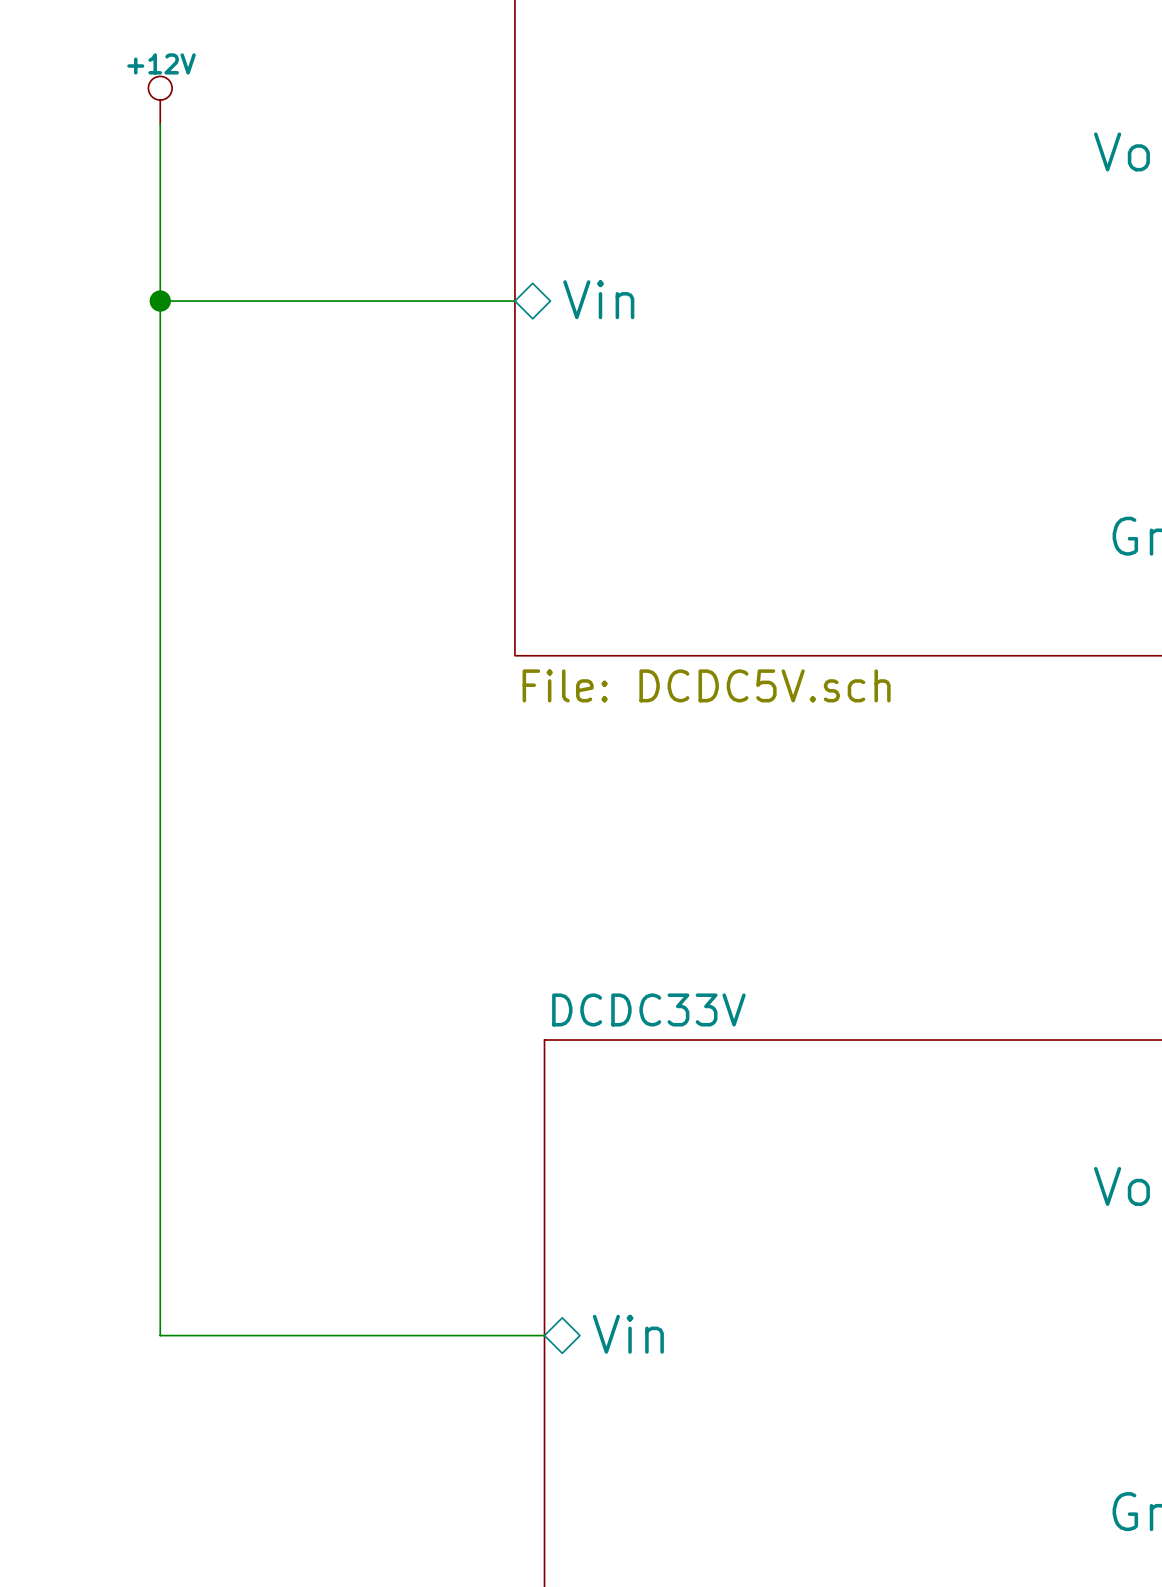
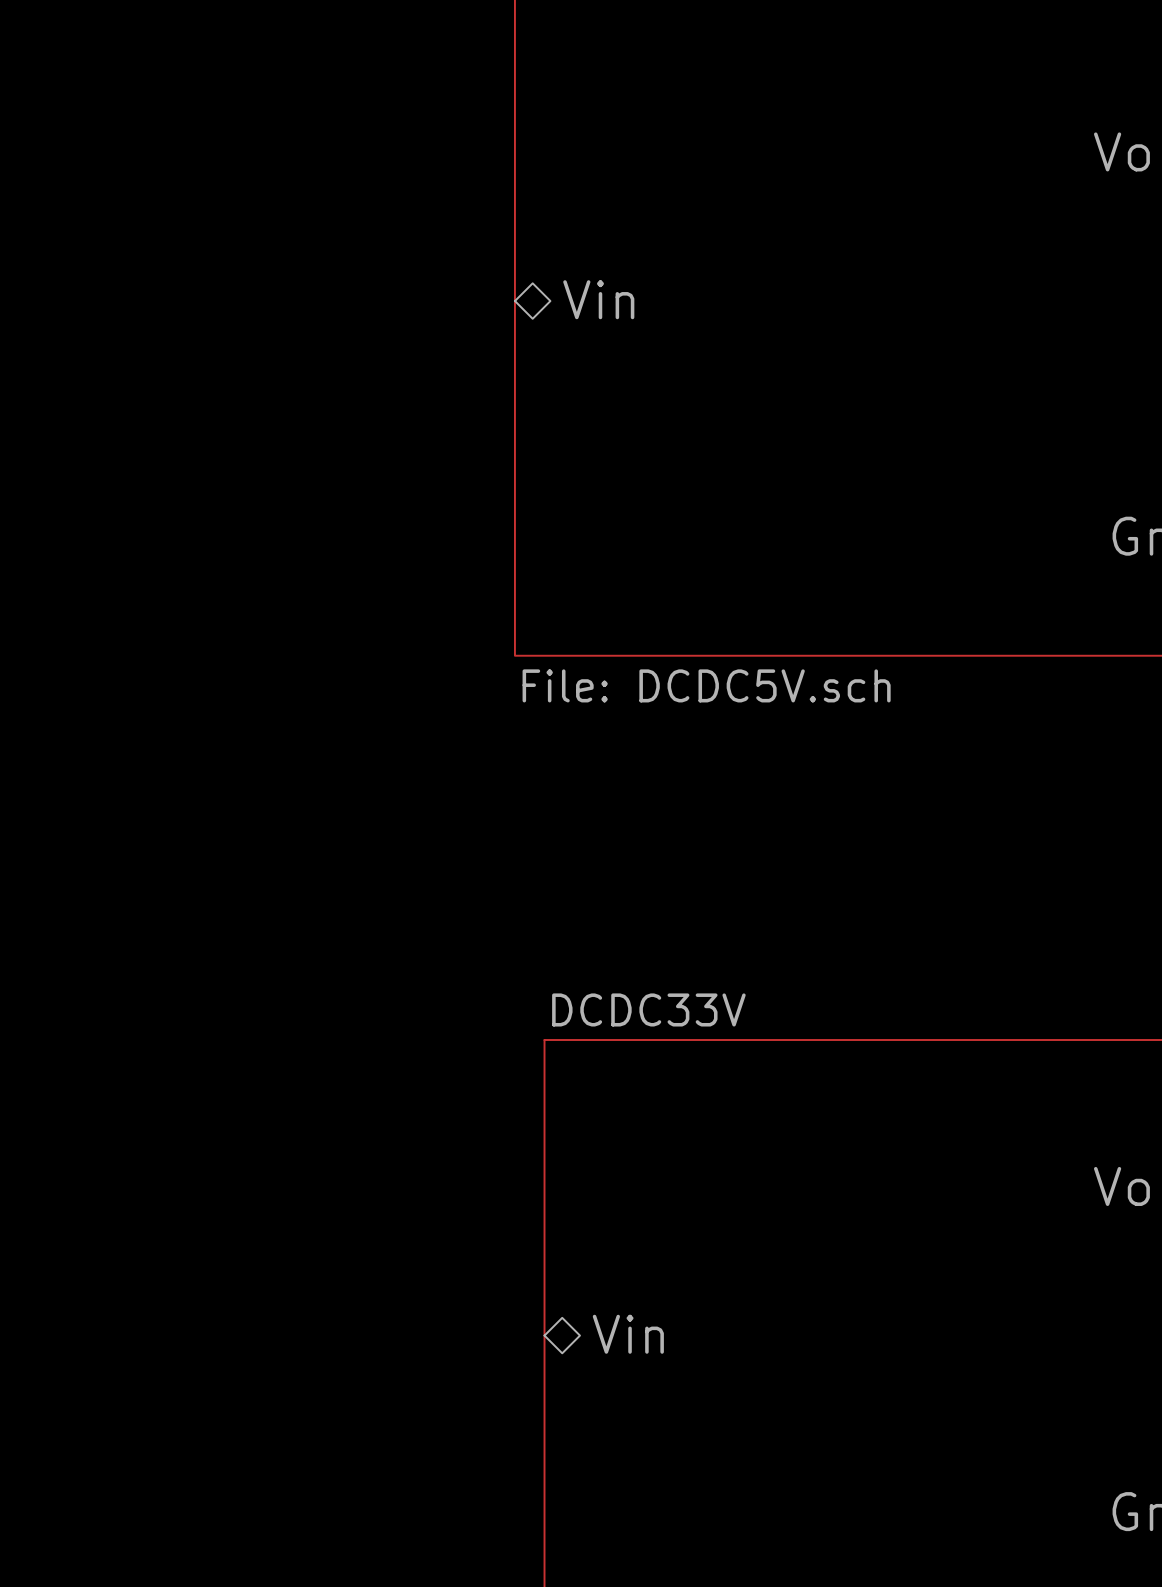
power symbol: +12V (160, 100) -> none
wire: (160, 123) (160, 1335) (544, 1335) -> none
wire: (160, 301) (514, 301) -> none
junction: (160, 301) -> none

